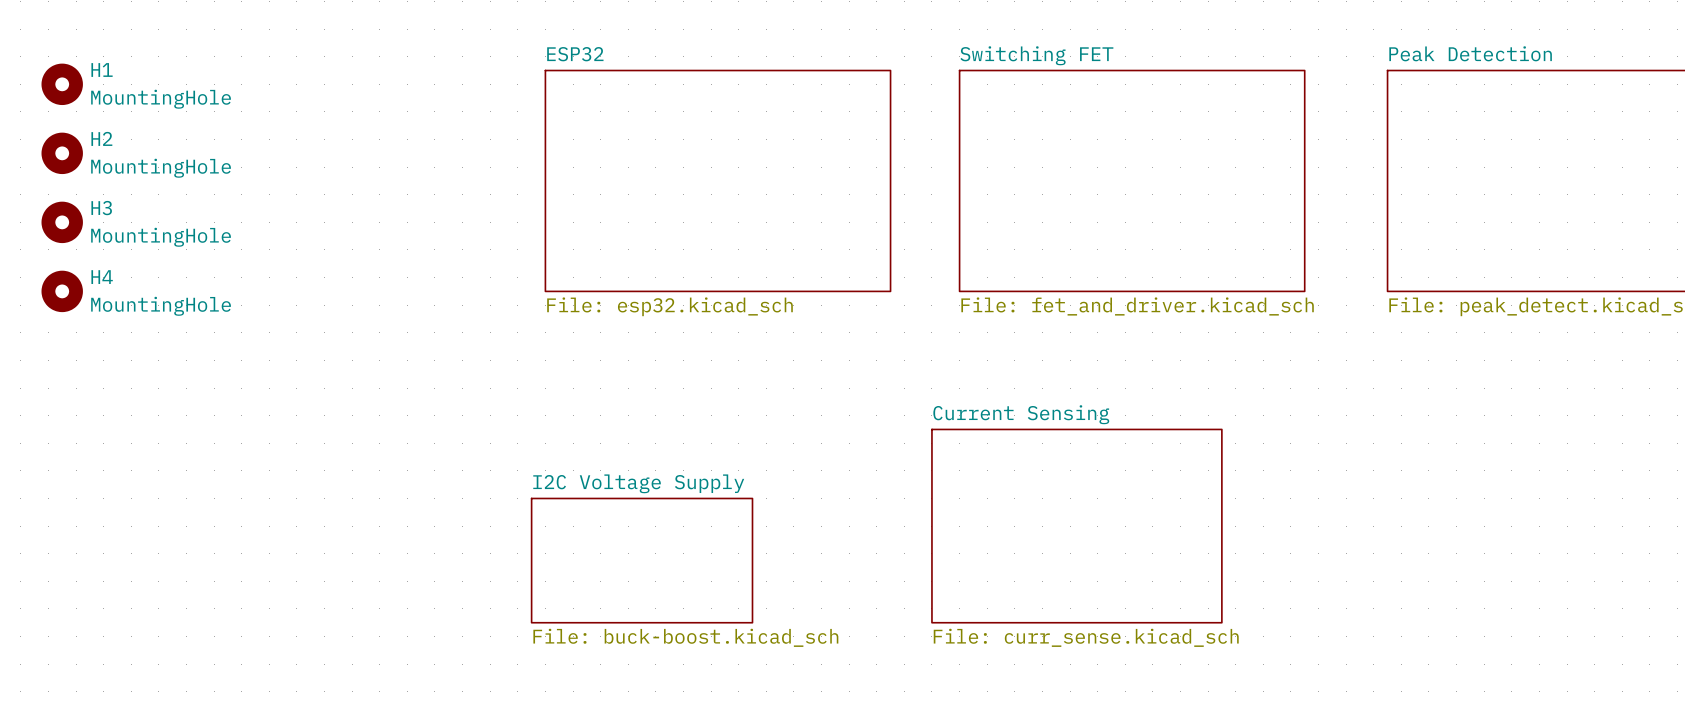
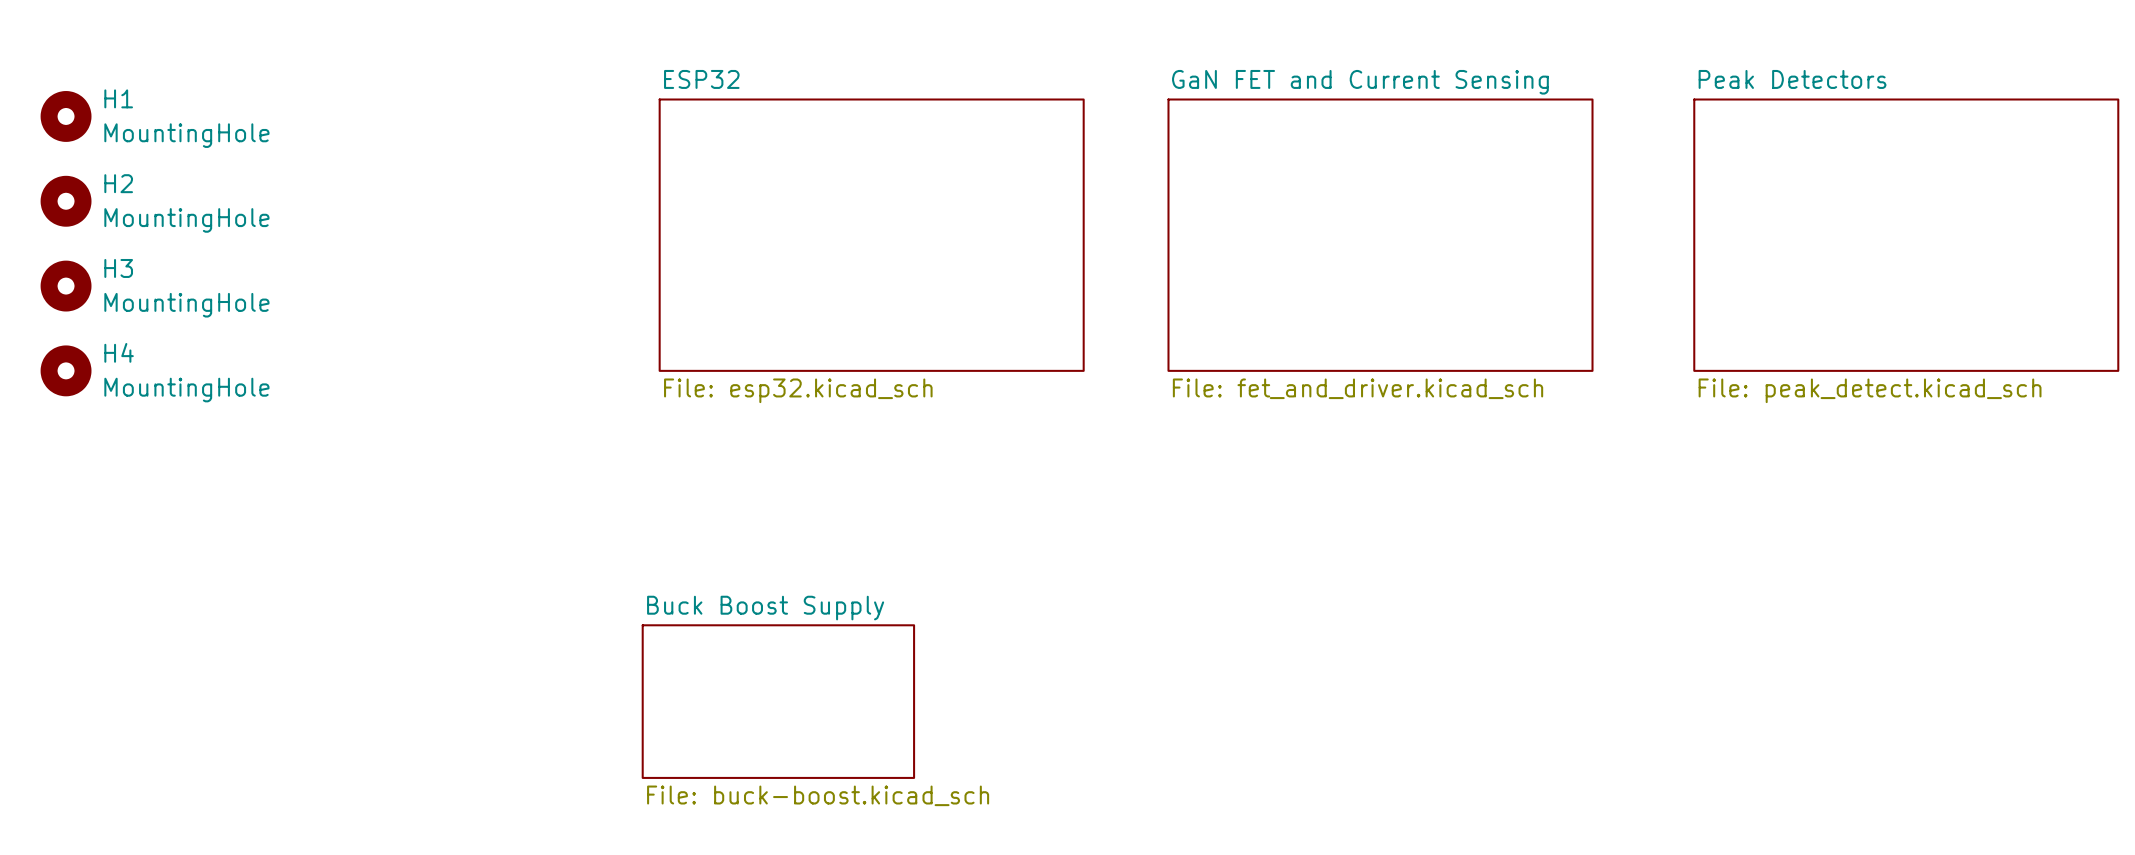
sheet Peak Detection name: Peak Detection (1470, 53) -> Peak Detectors (1792, 79)
sheet Switching FET name: Switching FET (1036, 55) -> GaN FET and Current Sensing (1360, 82)
sheet I2C Voltage Supply name: I2C Voltage Supply (638, 483) -> Buck Boost Supply (765, 608)
sheet Current Sensing: File: curr_sense.kicad_sch (1076, 526) -> none

